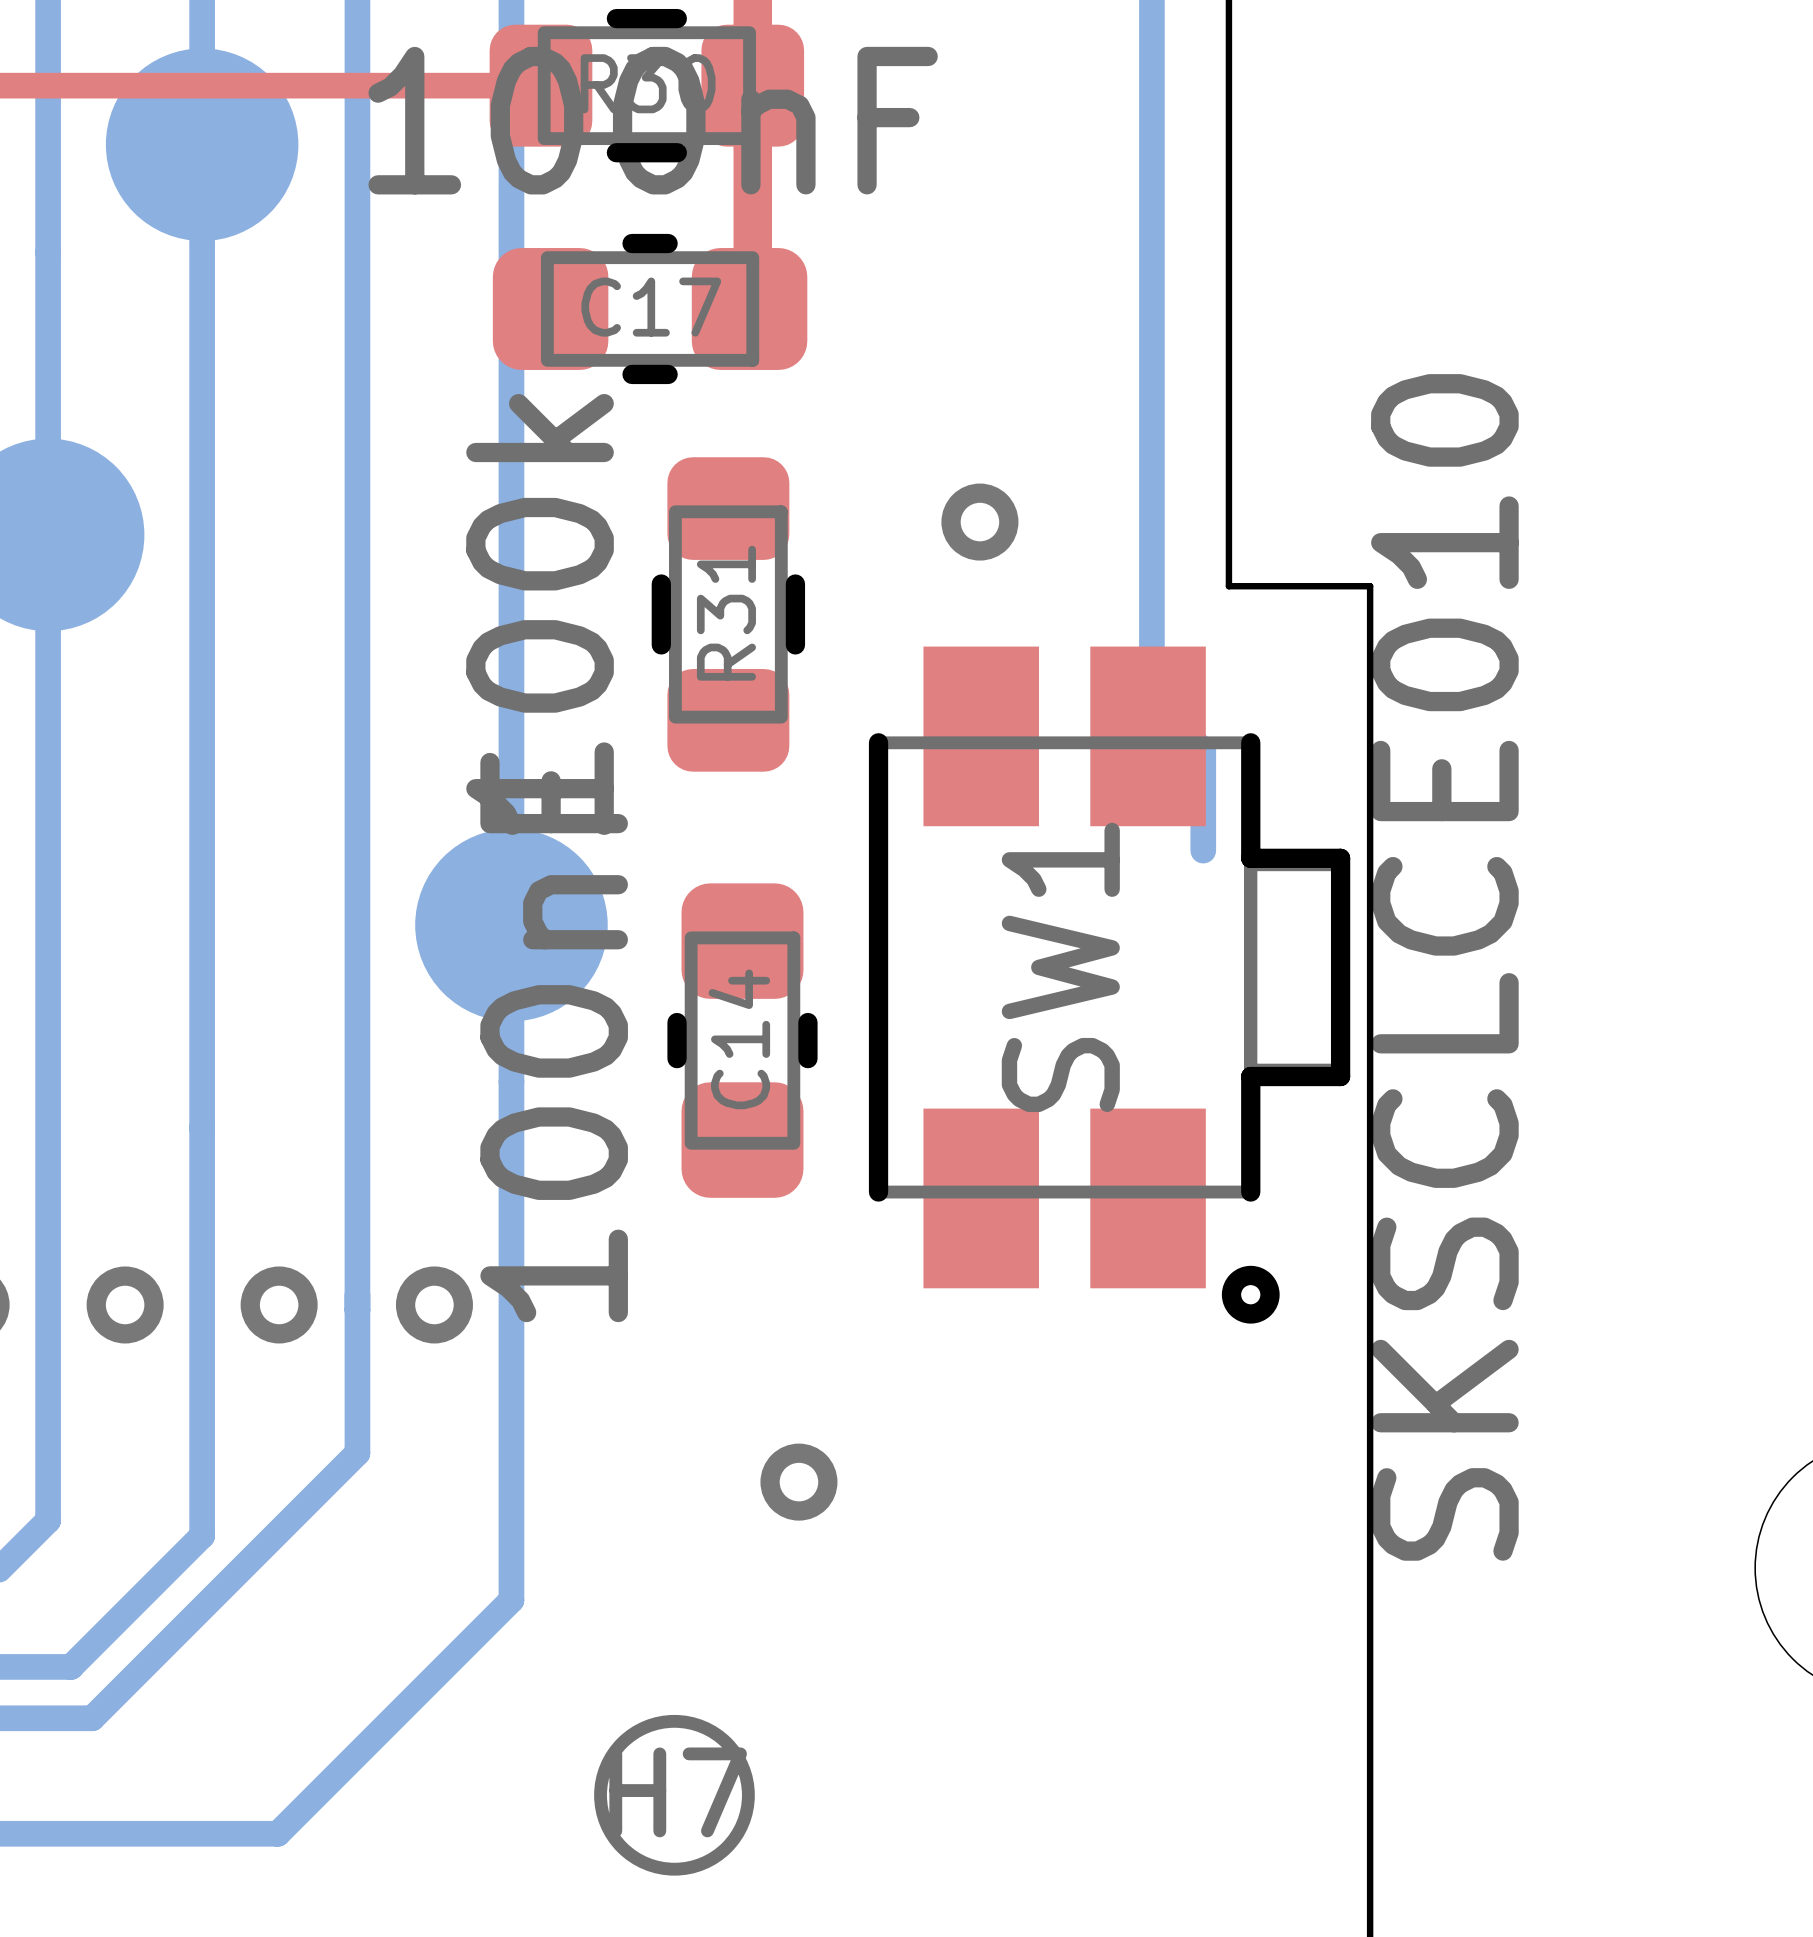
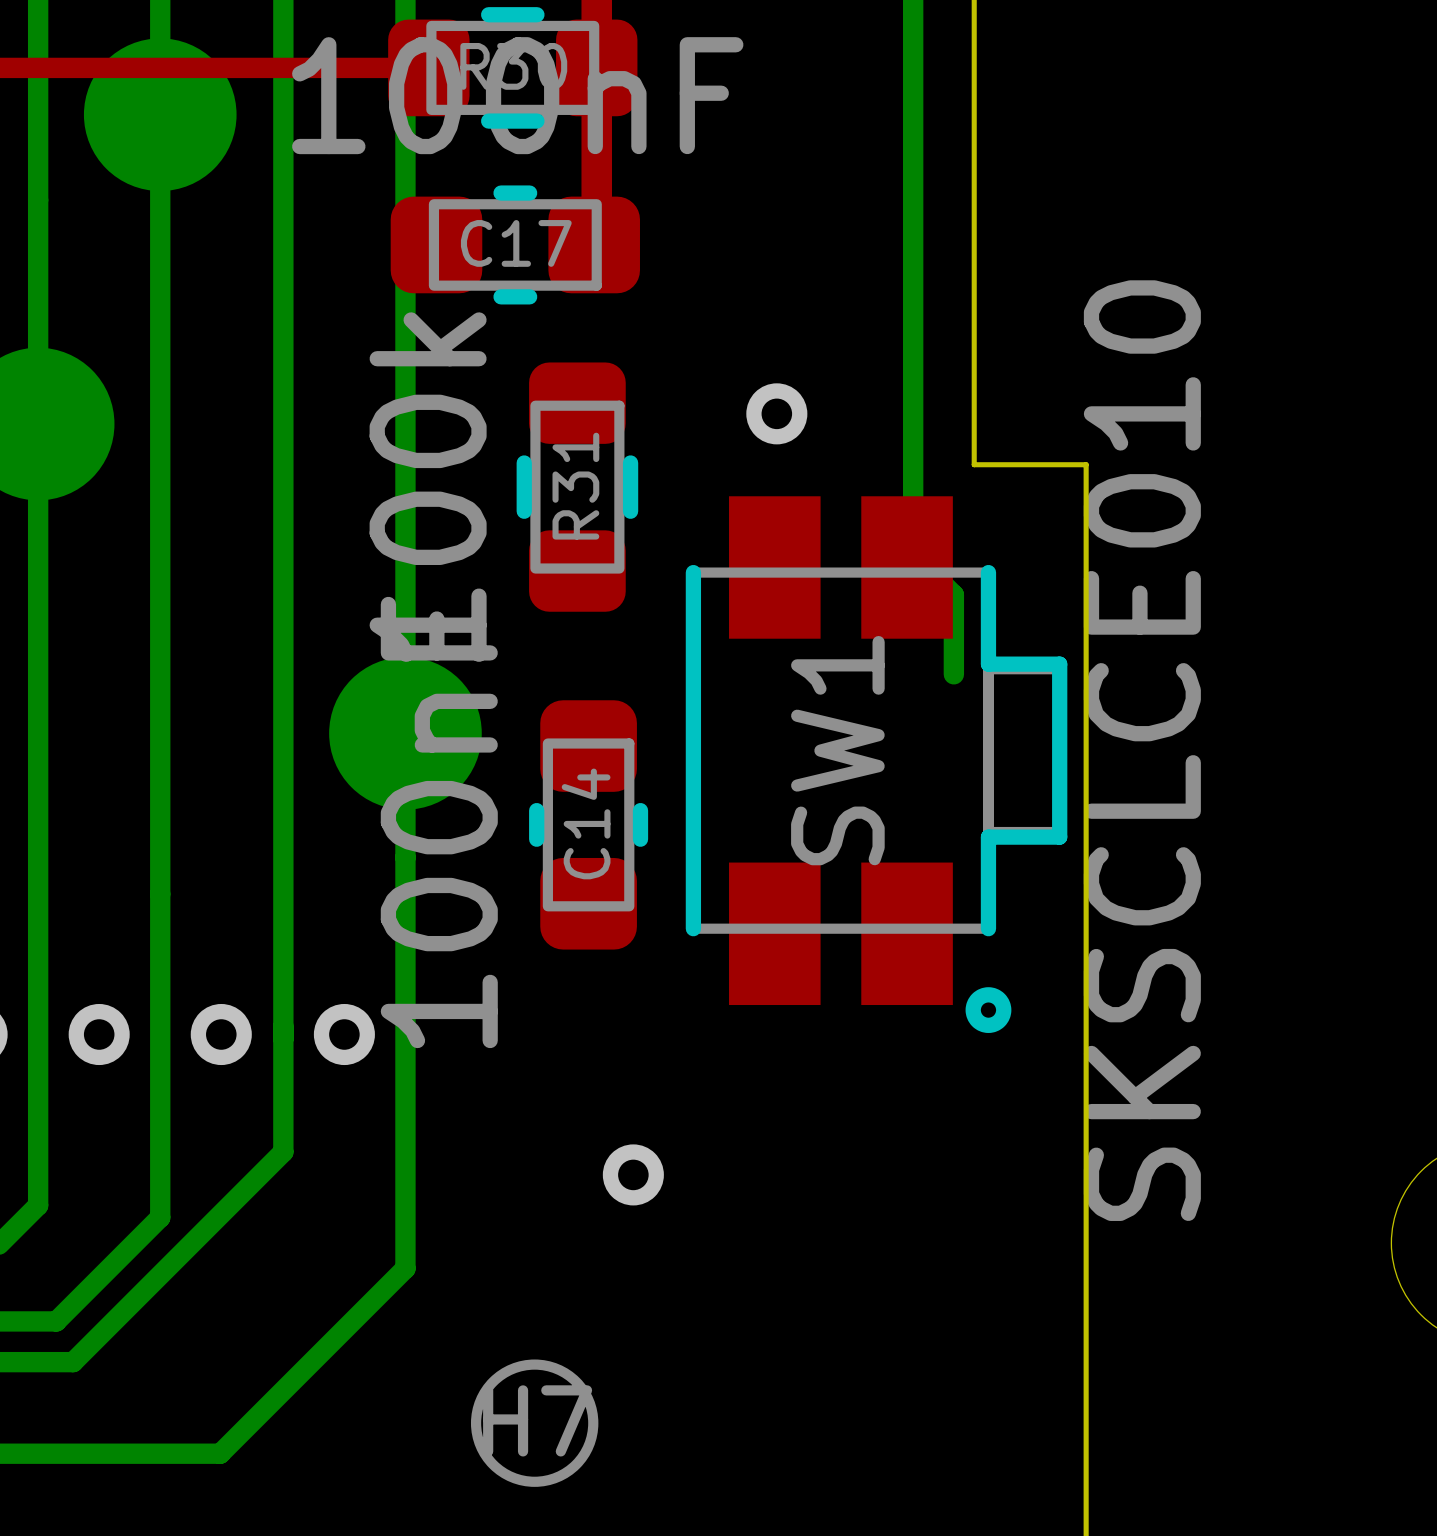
SW1 position: (1109, 985) -> (876, 764)

